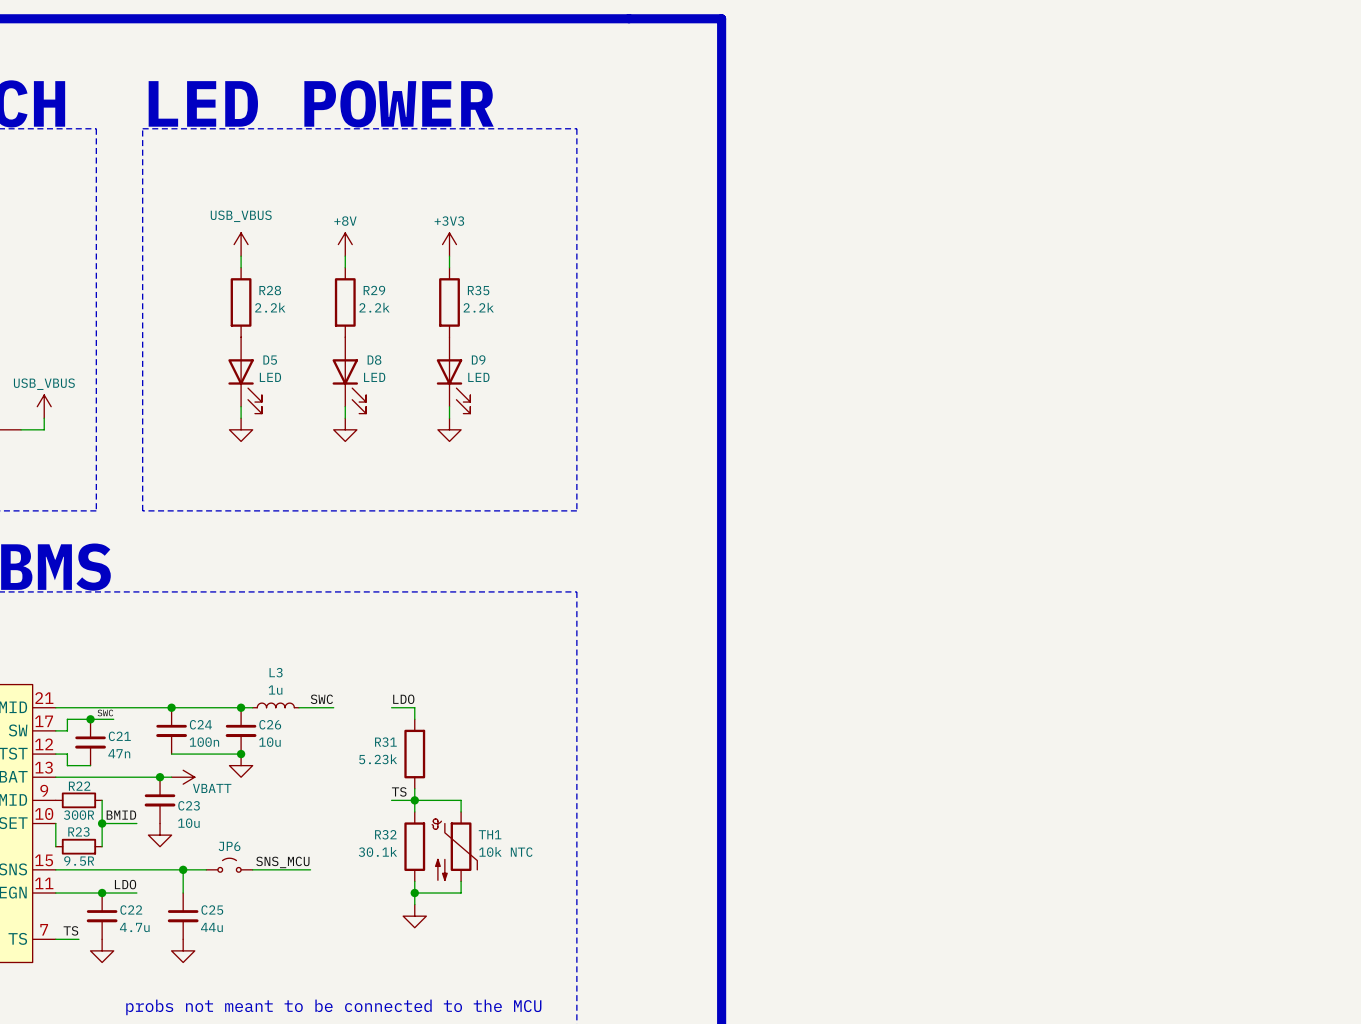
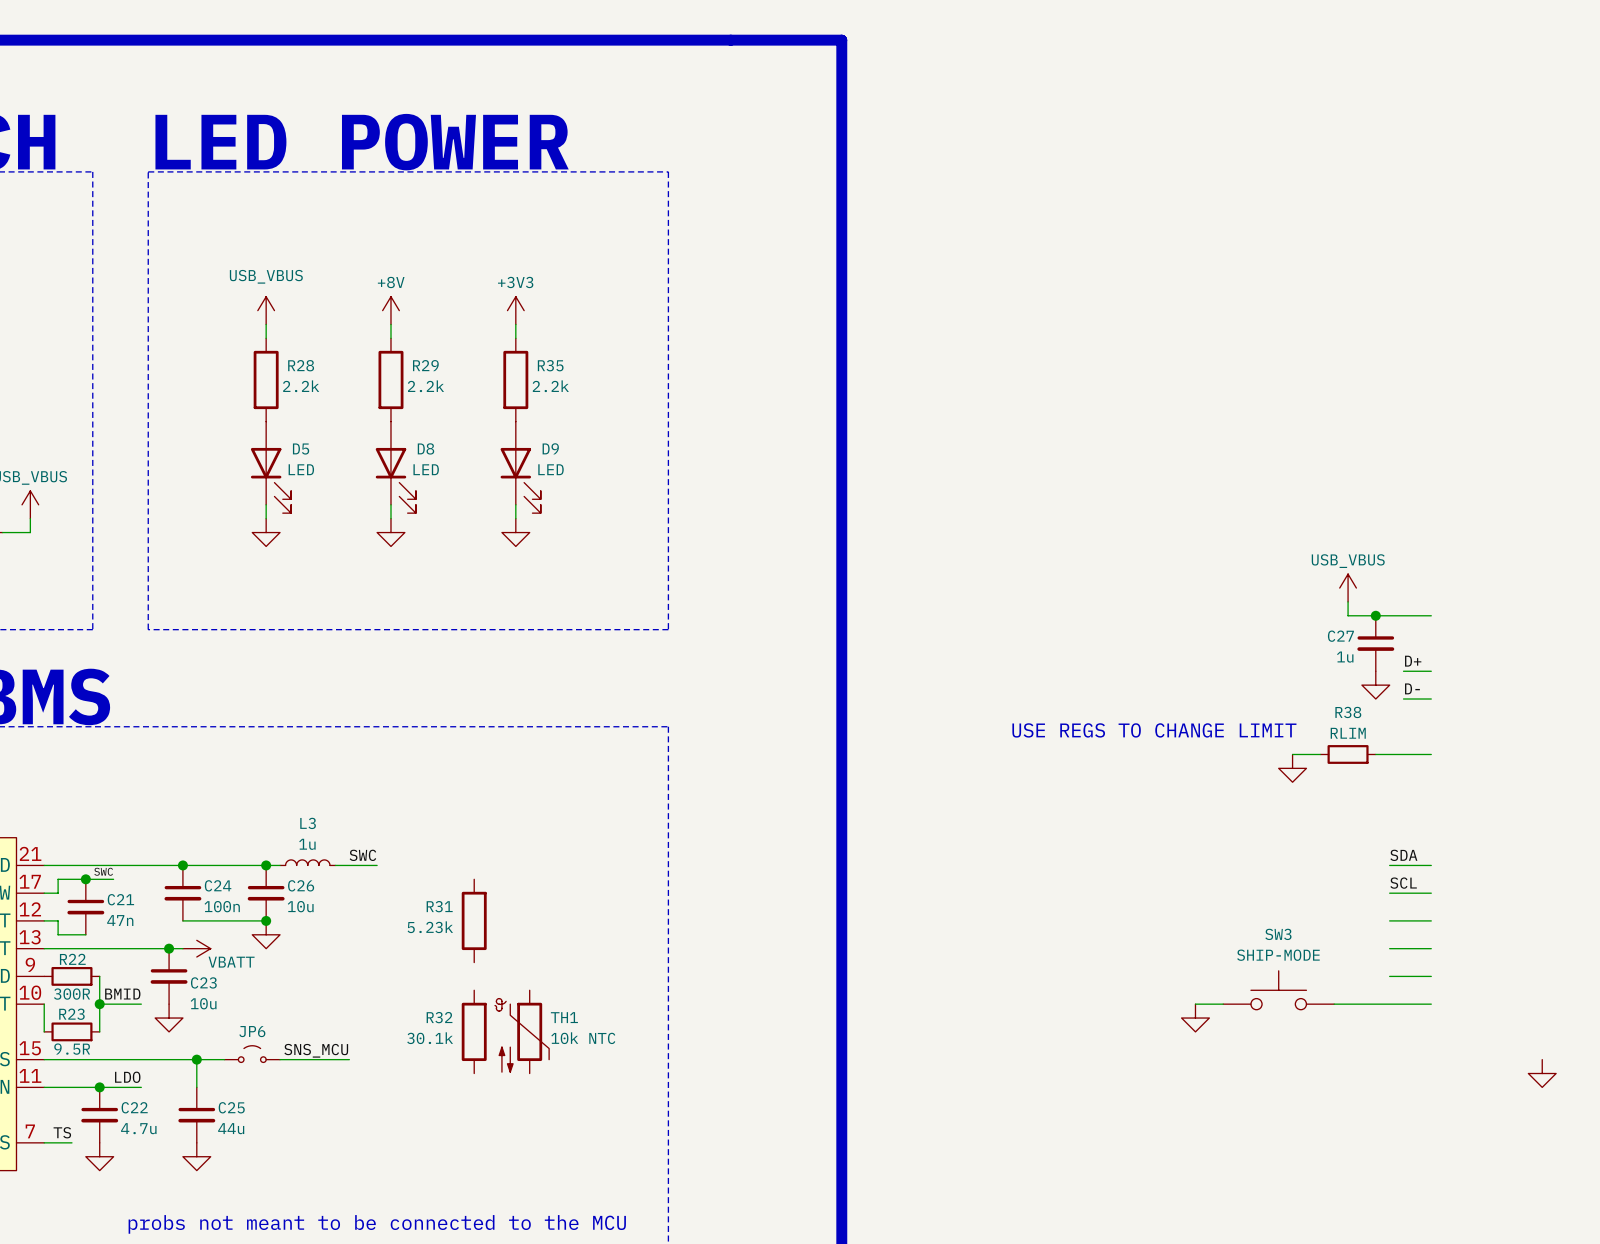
power symbol: none -> USB_VBUS (1348, 588)
wire: none -> (1348, 601) (1348, 615) (1431, 615)
junction: none -> (1375, 615)
C27: none -> 1u (1375, 643)
label: none -> D+ (1413, 661)
wire: none -> (1403, 671) (1431, 671)
power symbol: none -> (1375, 685)
label: none -> D- (1412, 688)
wire: none -> (1403, 699) (1431, 699)
text: none -> USE REGS TO CHANGE LIMIT (1154, 730)
wire: none -> (1292, 754) (1320, 754)
R38: none -> RLIM (1348, 754)
wire: none -> (1375, 754) (1431, 754)
power symbol: none -> (1292, 768)
label: LDO (403, 699) -> none
label: none -> SDA (1403, 855)
wire: (391, 707) (414, 707) (414, 719) -> none
wire: none -> (1389, 865) (1431, 865)
label: none -> SCL (1403, 883)
wire: none -> (1389, 893) (1431, 893)
wire: none -> (1389, 920) (1431, 920)
wire: none -> (1389, 948) (1431, 948)
wire: (414, 788) (414, 811) -> none
label: TS (399, 791) -> none
wire: (391, 800) (461, 800) (461, 811) -> none
junction: (414, 800) -> none
wire: none -> (1389, 976) (1431, 976)
SW3: none -> SHIP-MODE (1278, 990)
wire: none -> (1195, 1004) (1223, 1004)
wire: none -> (1334, 1004) (1431, 1004)
power symbol: none -> (1195, 1018)
wire: (414, 881) (414, 904) -> none
wire: (461, 881) (461, 893) (414, 893) -> none
power symbol: none -> (1542, 1073)
junction: (414, 893) -> none
power symbol: (414, 916) -> none

